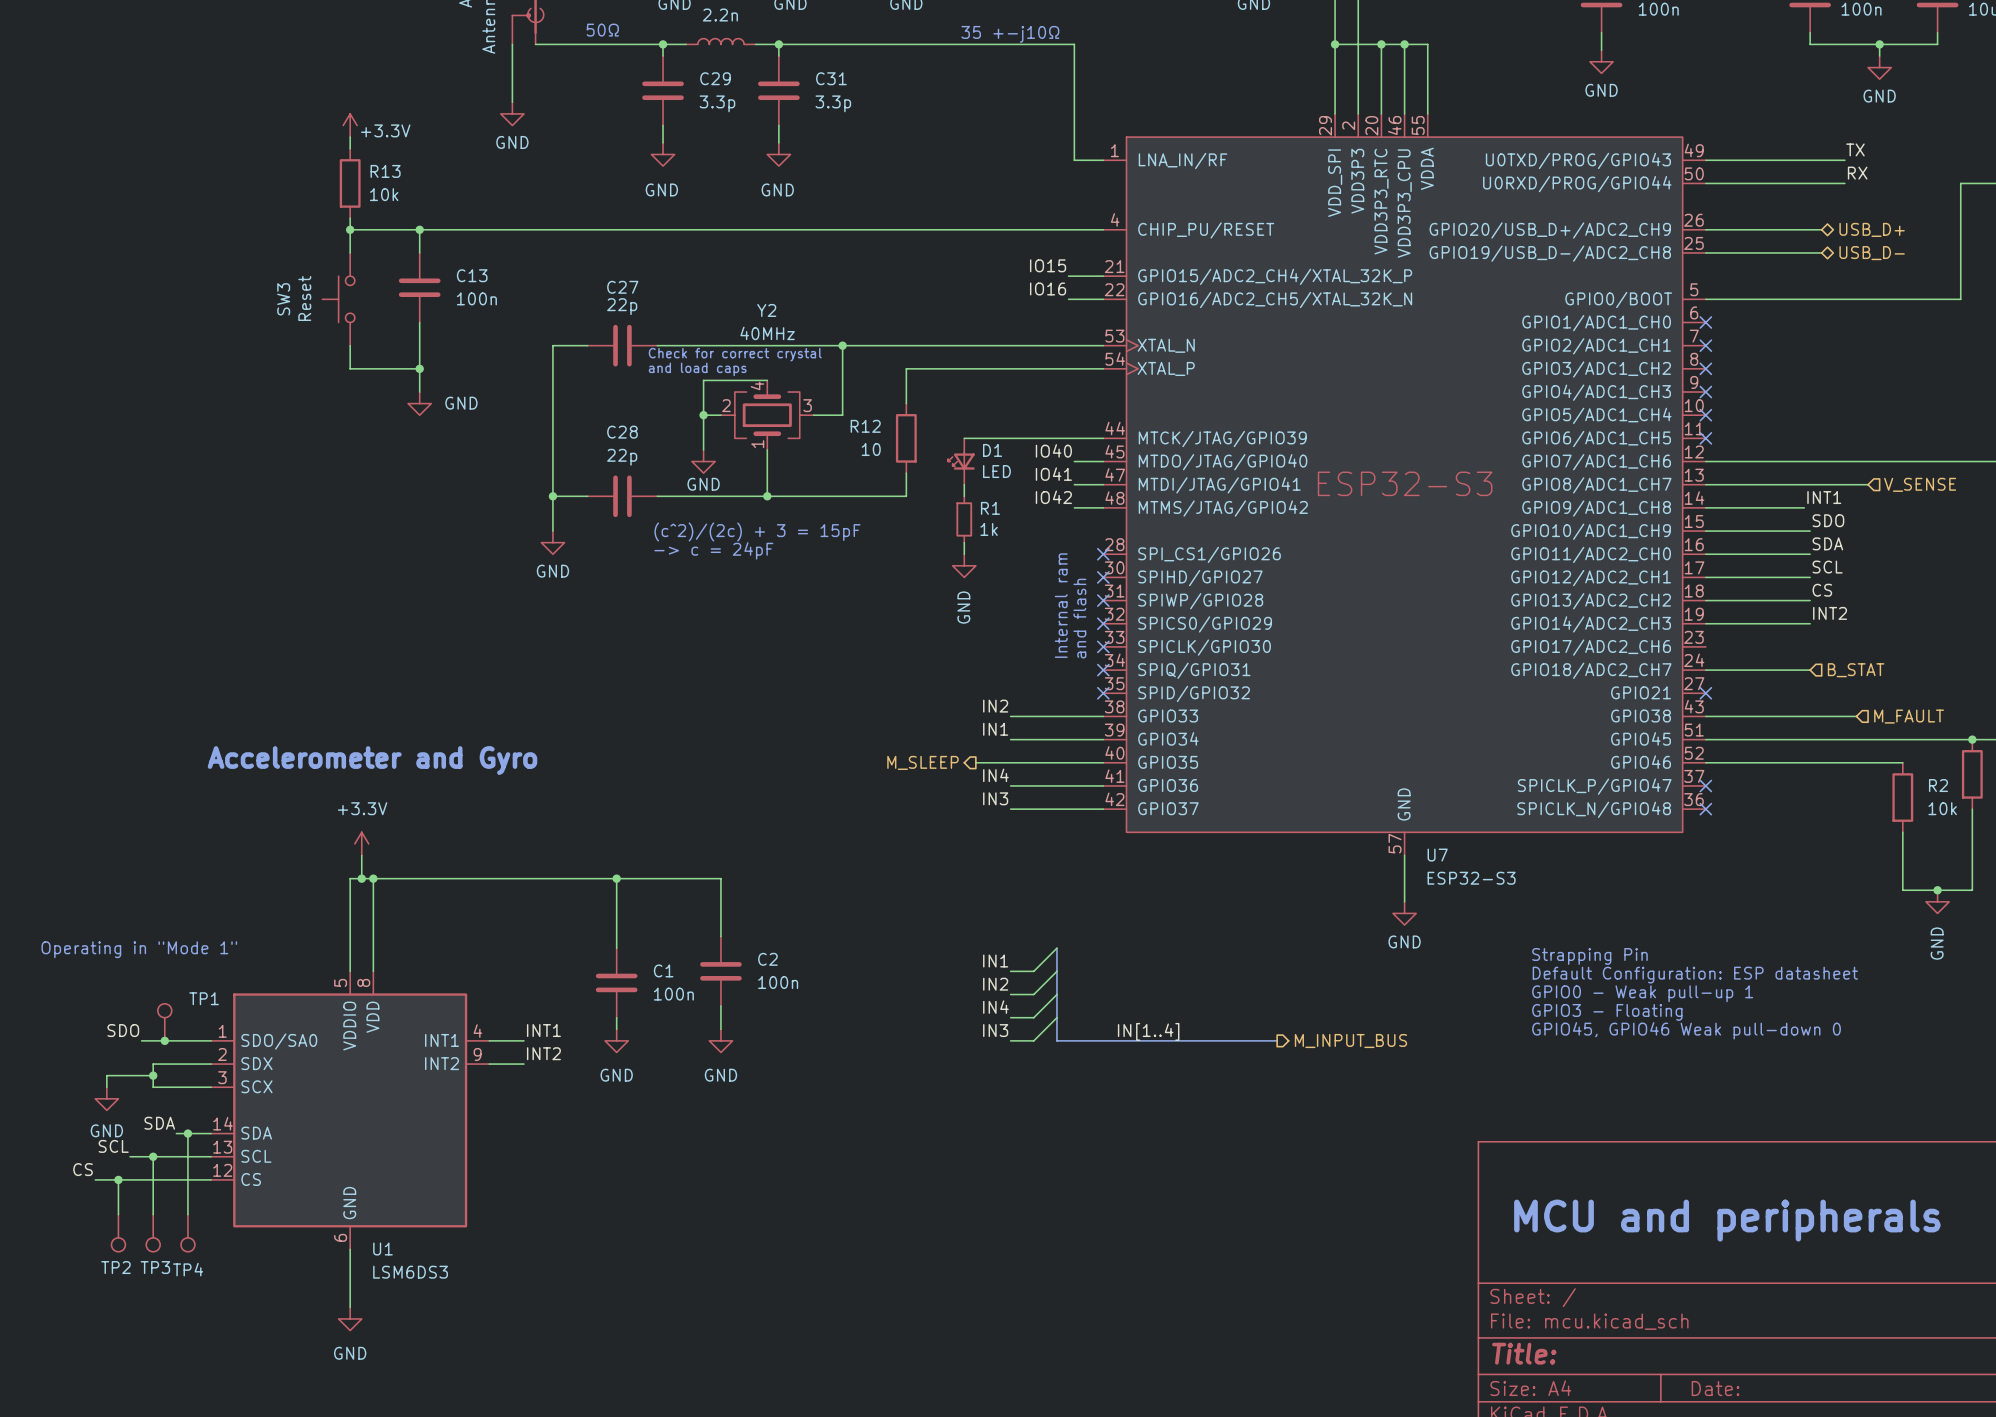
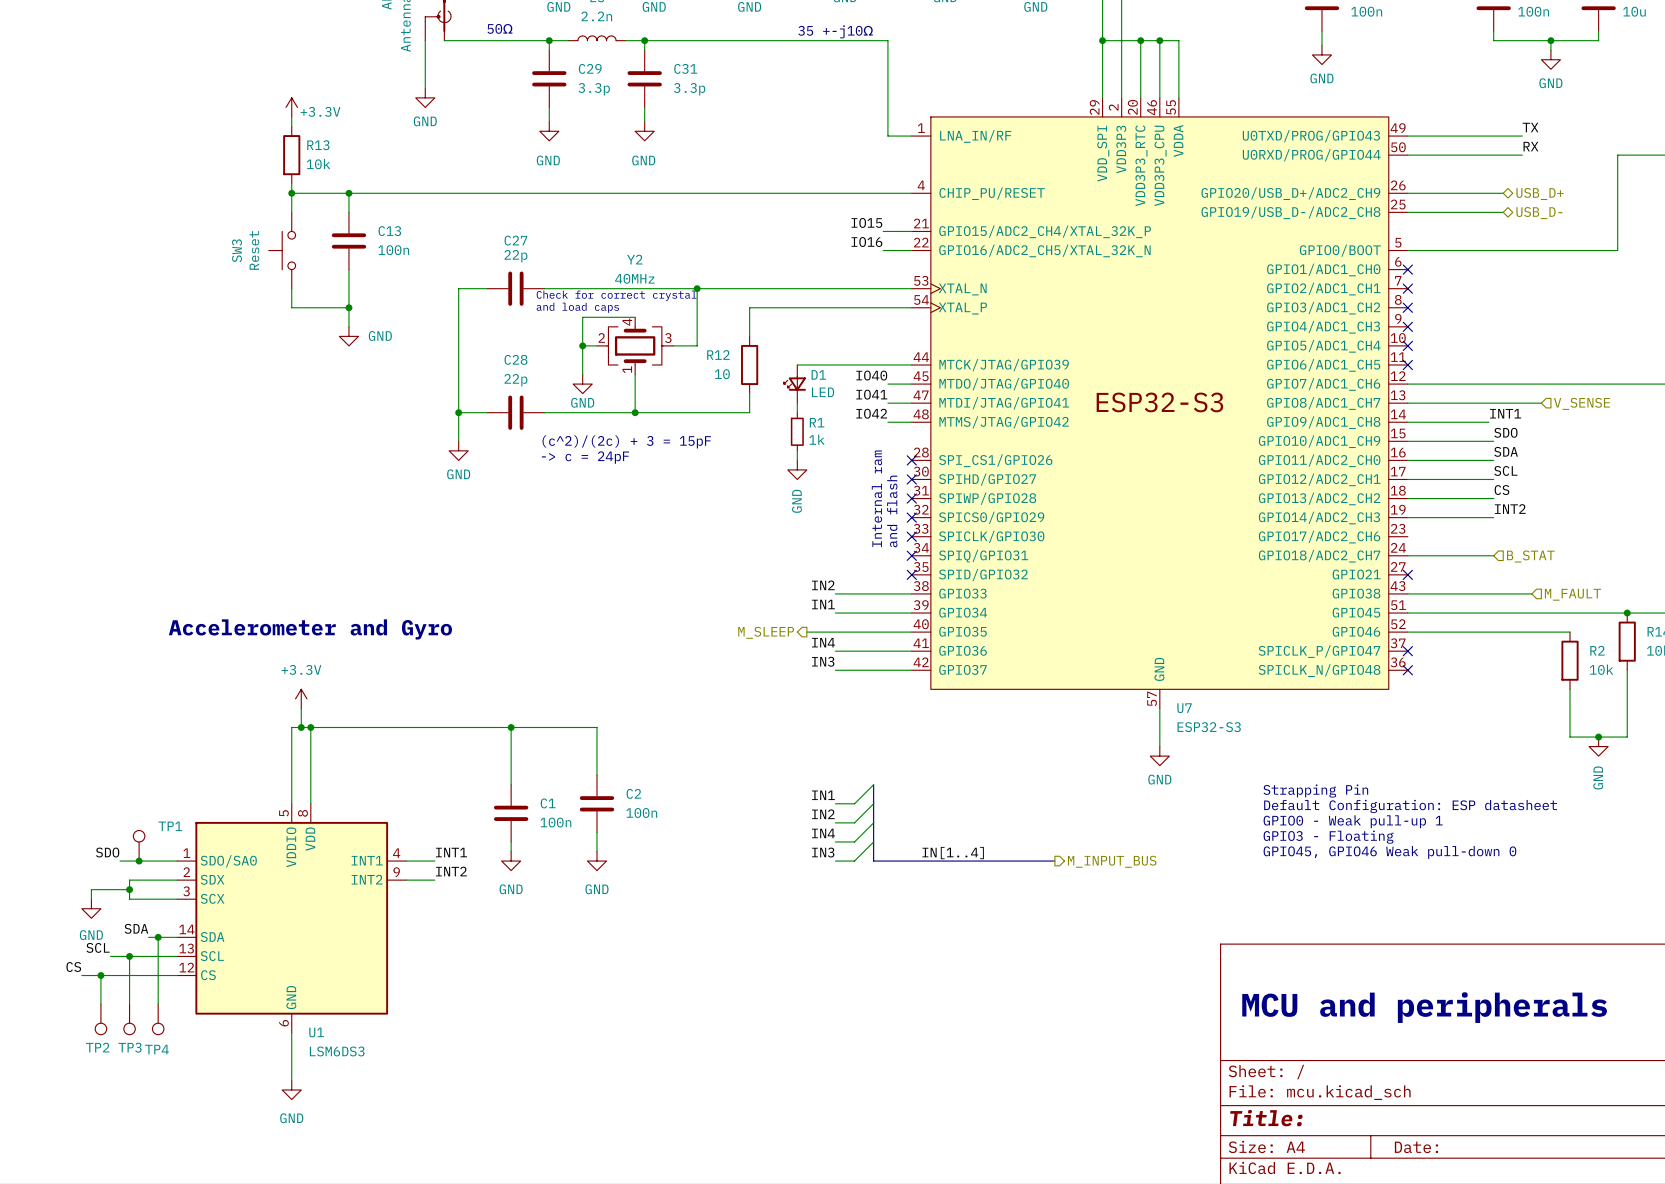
text: Operating in "Mode 1" (139, 949) -> none

